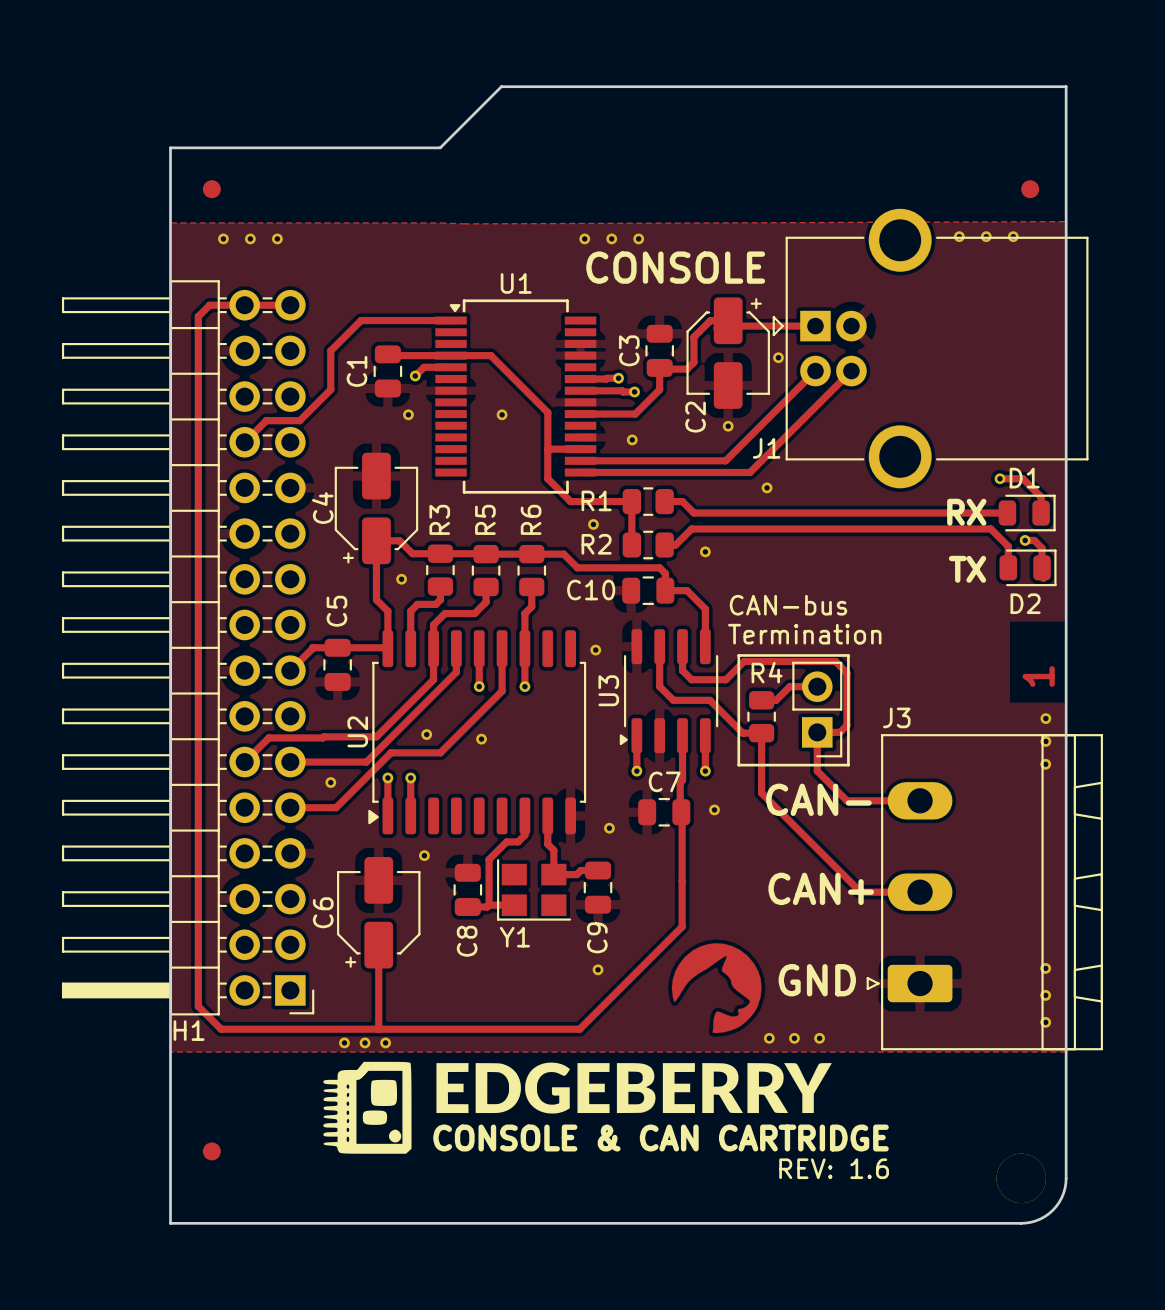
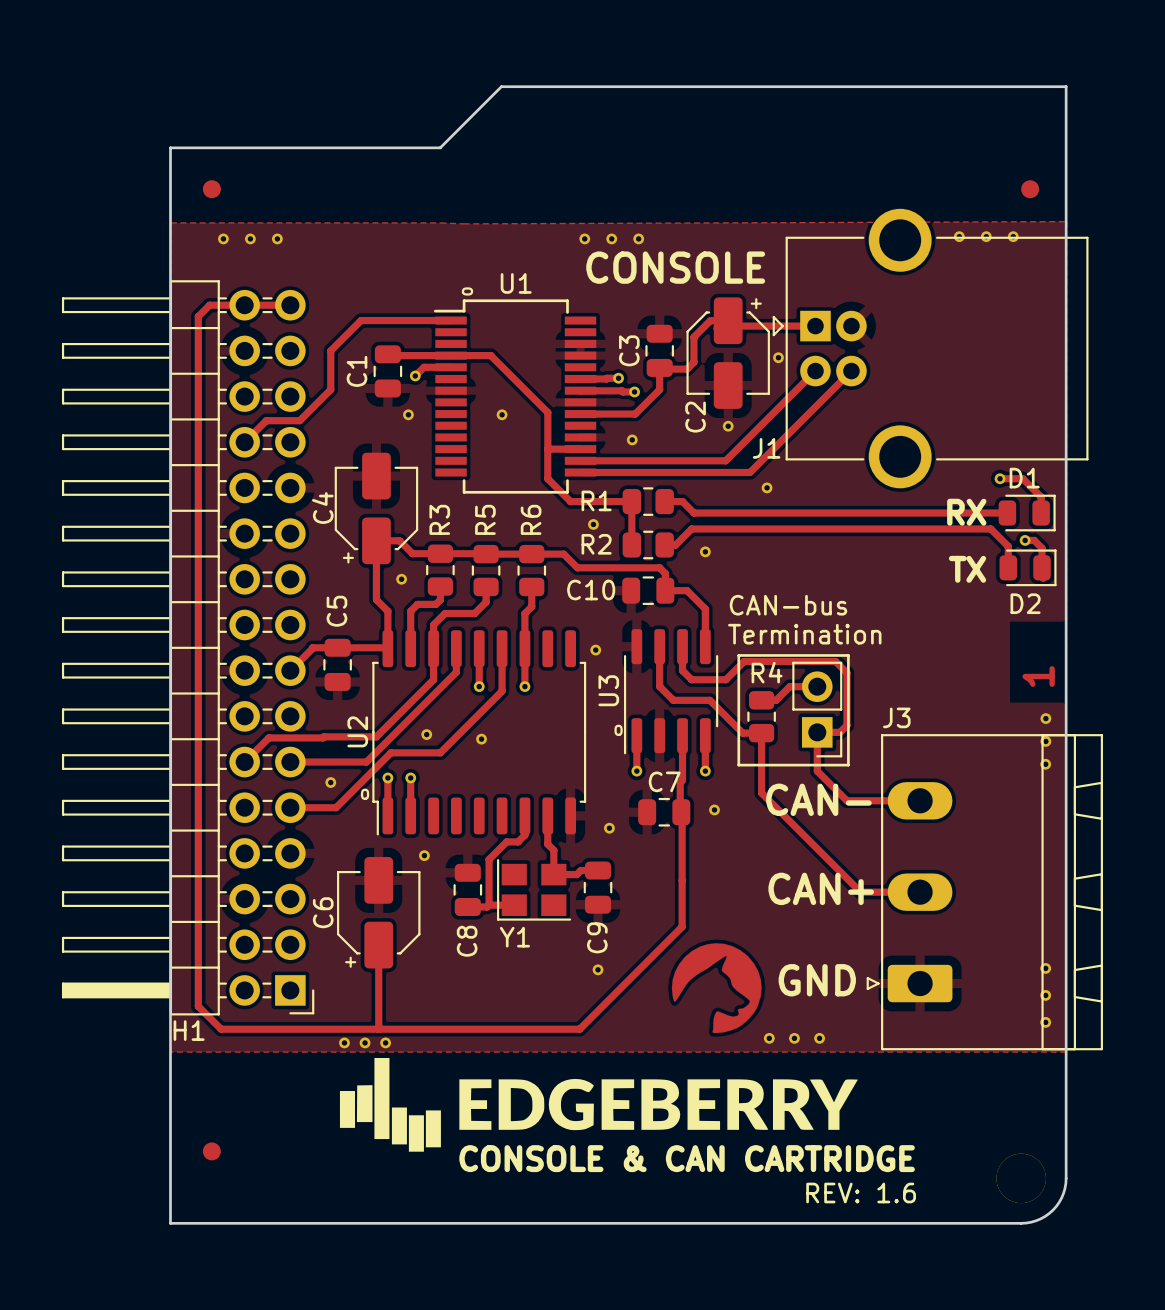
text: none -> O (467, 291)
U1 footprint: [435, 299, 597, 494] -> [433, 299, 597, 494]
U3 footprint: [619, 629, 719, 754] -> [623, 629, 719, 755]
U2 footprint: [368, 630, 587, 835] -> [372, 630, 587, 836]
text: none -> O (618, 730)
text: none -> O (365, 794)
drawing: none -> [339, 1057, 858, 1152]
drawing: [323, 1061, 412, 1154] -> none
drawing: [436, 1062, 832, 1114] -> none
text position: CONSOLE & CAN CARTRIDGE (661, 1138) -> CONSOLE & CAN CARTRIDGE (687, 1158)
text position: REV: 1.6 (834, 1168) -> REV: 1.6 (861, 1193)

